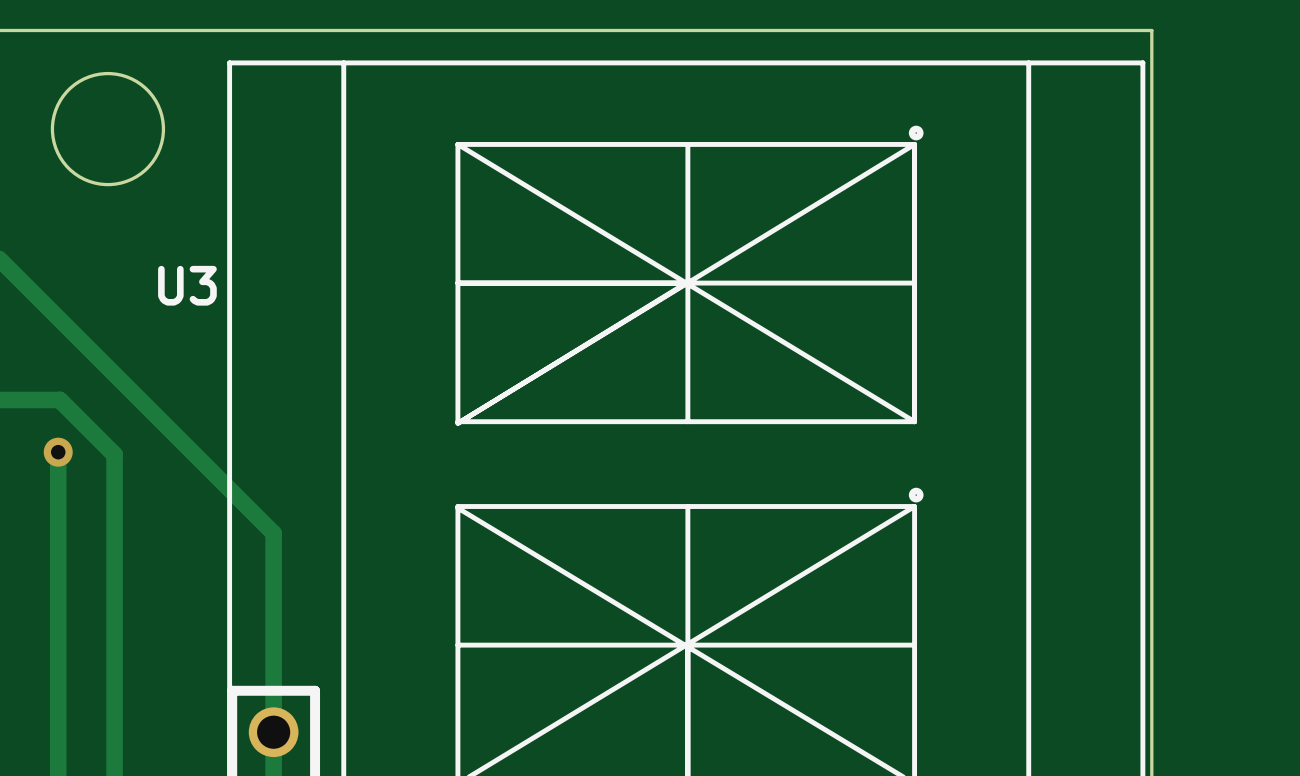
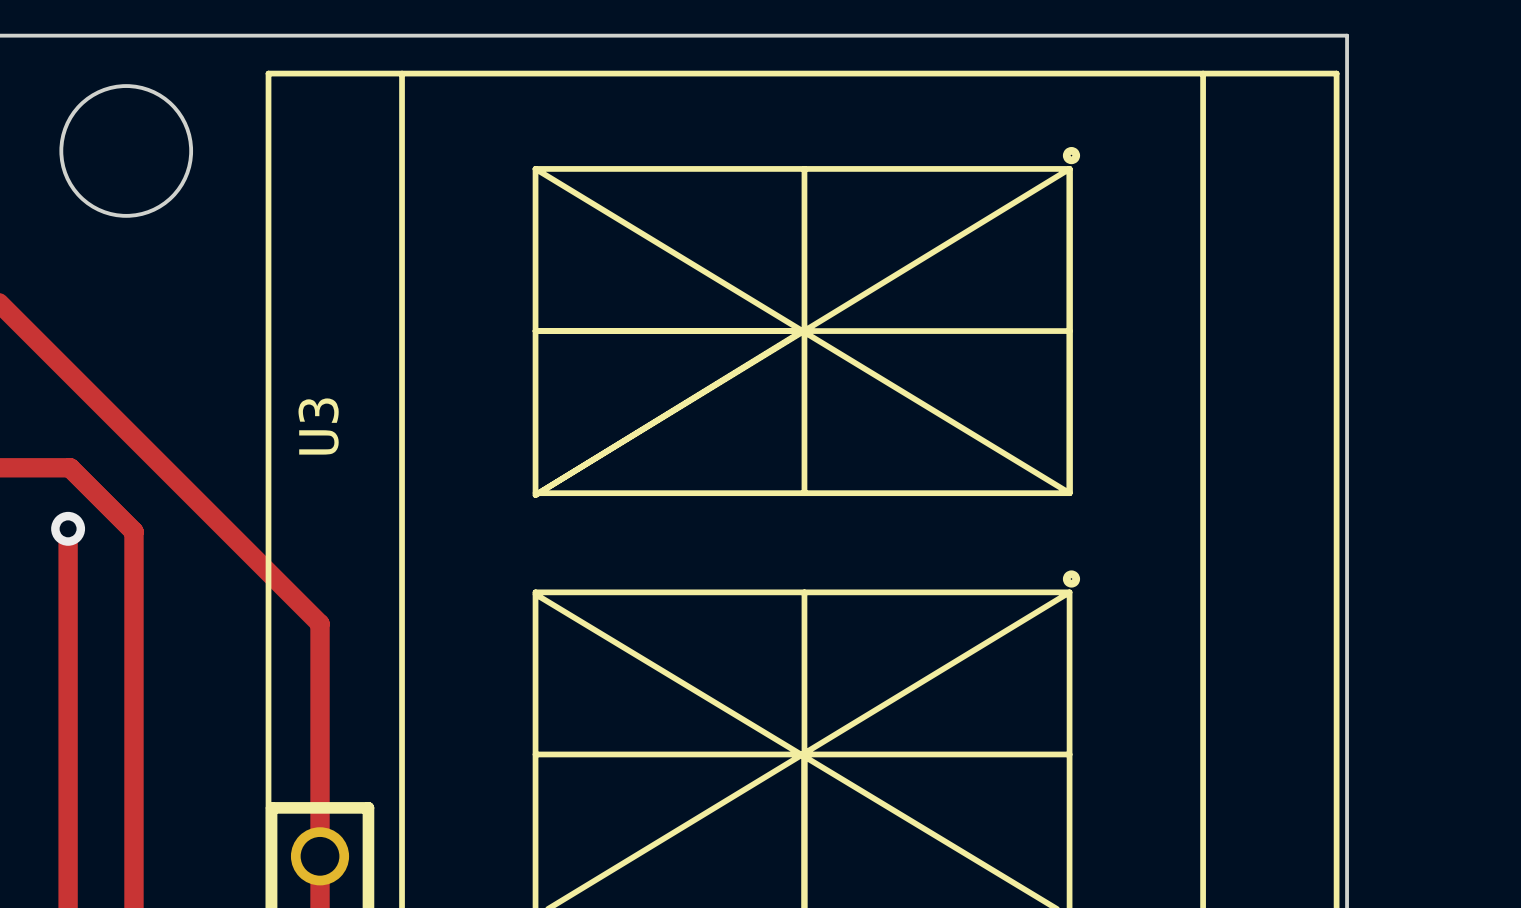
U3 name rotation: 0° (187, 285) -> 90° counterclockwise (318, 426)
U3 name position: U3 (187, 285) -> U3 (318, 426)

